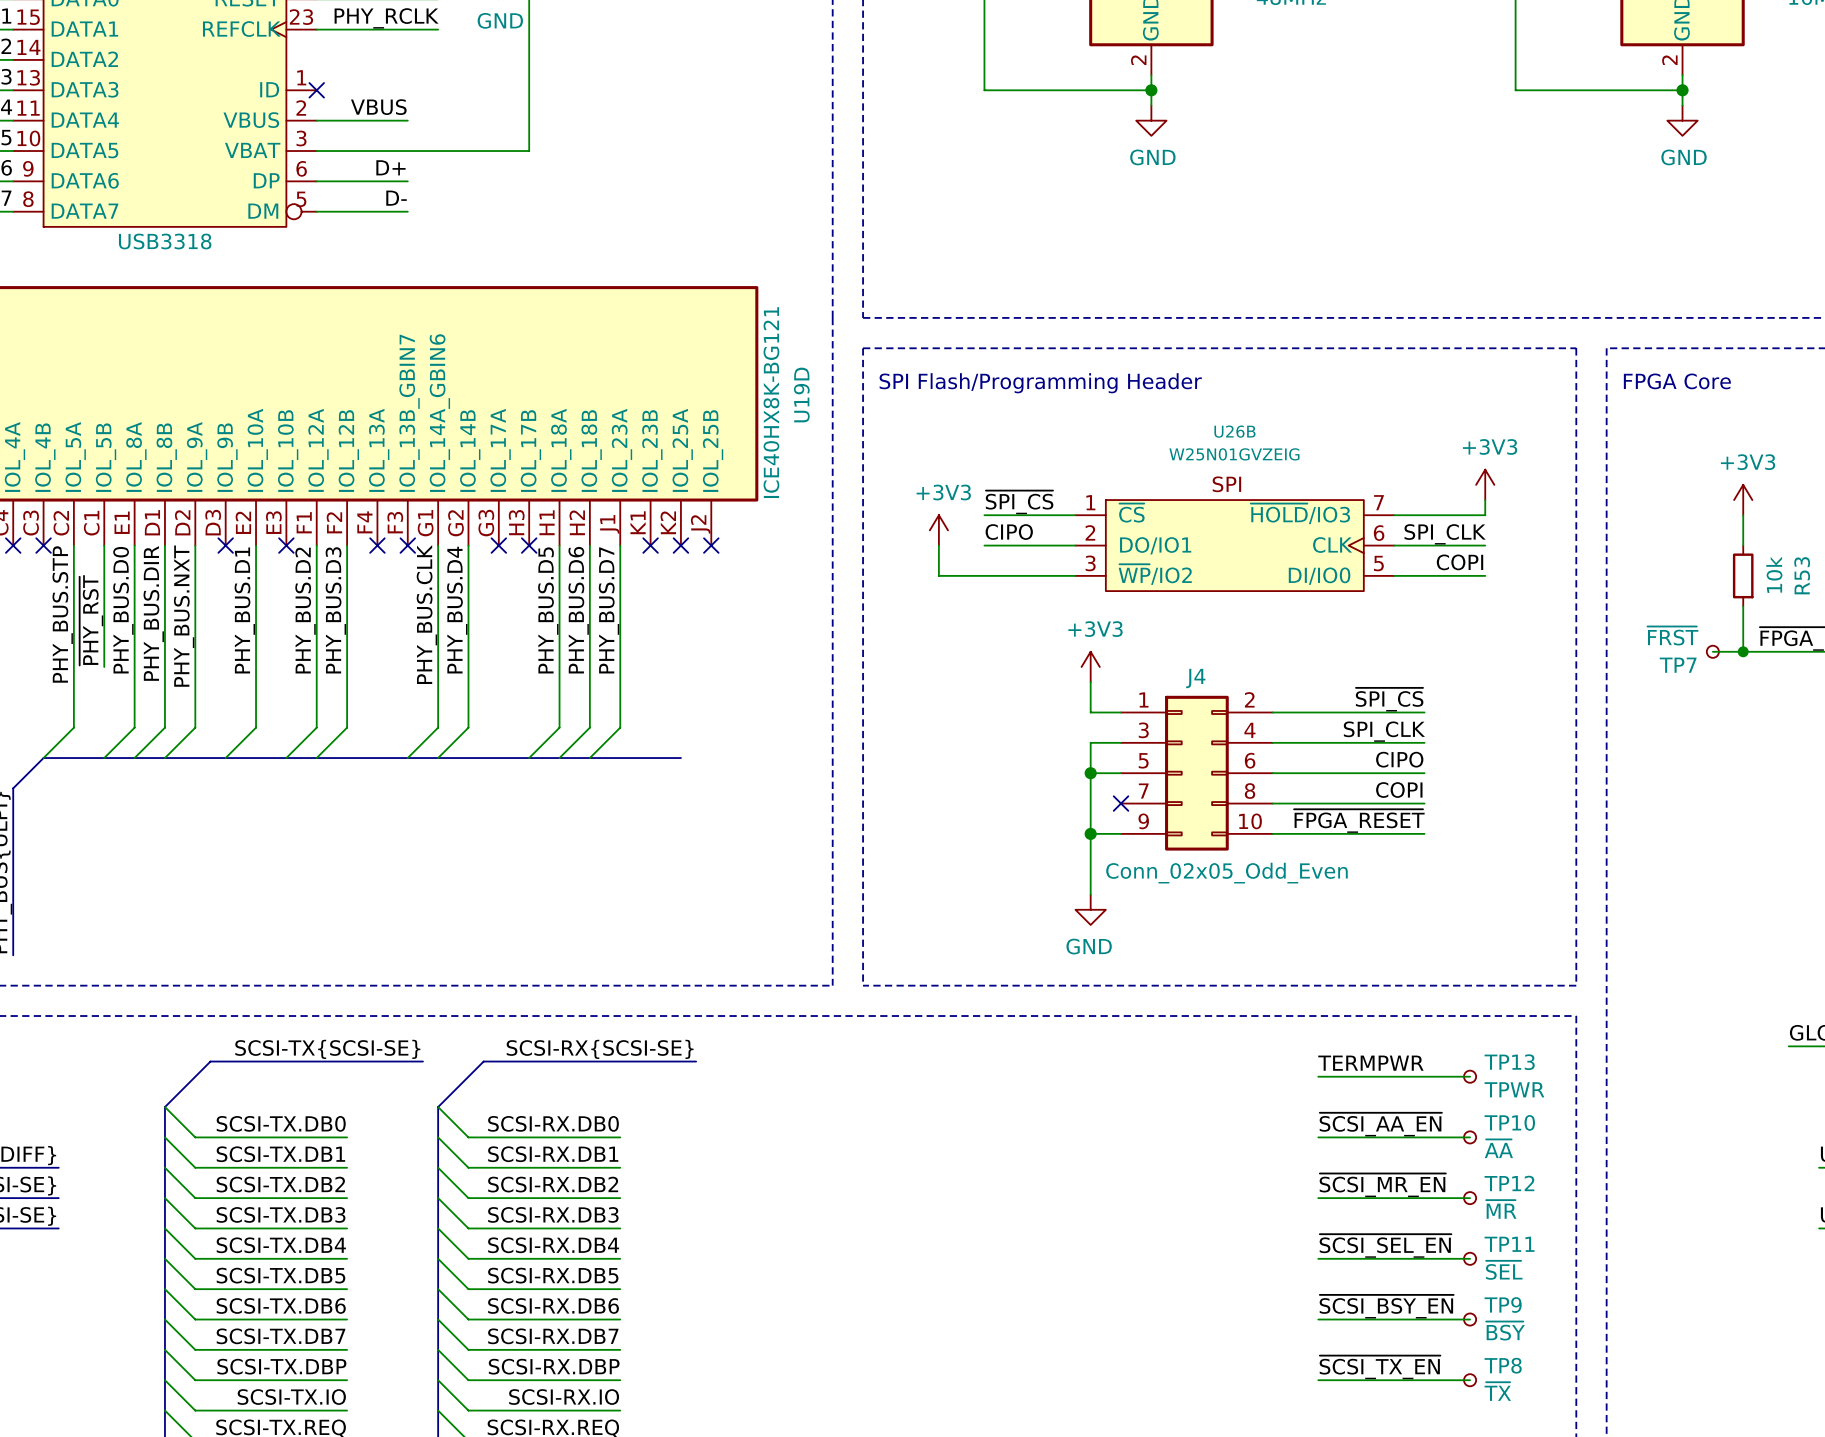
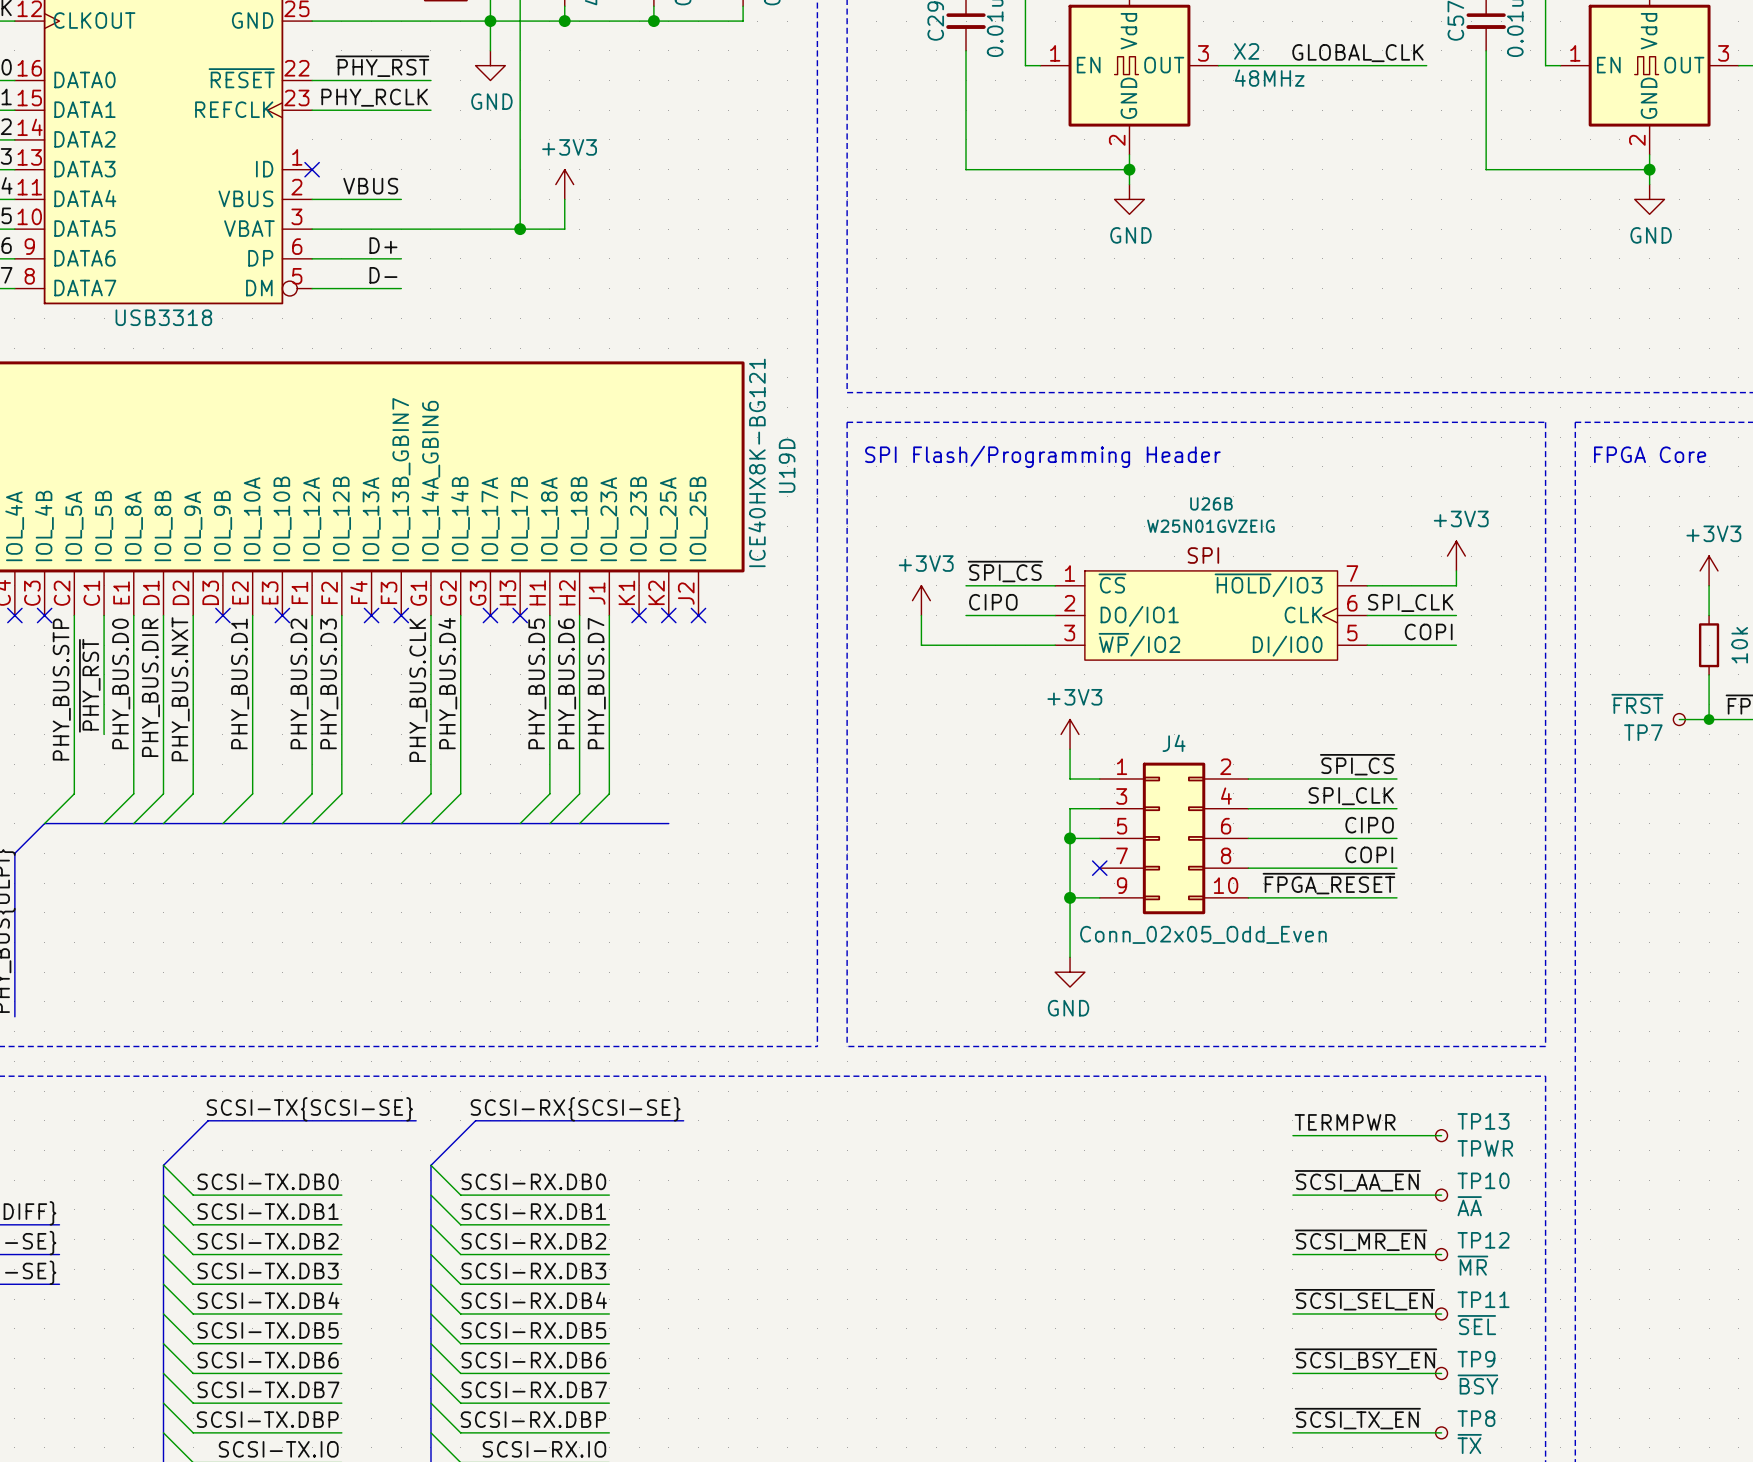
power symbol: none -> +3V3 (564, 184)
wire: none -> (564, 199) (564, 229) (520, 229)
junction: none -> (520, 229)

